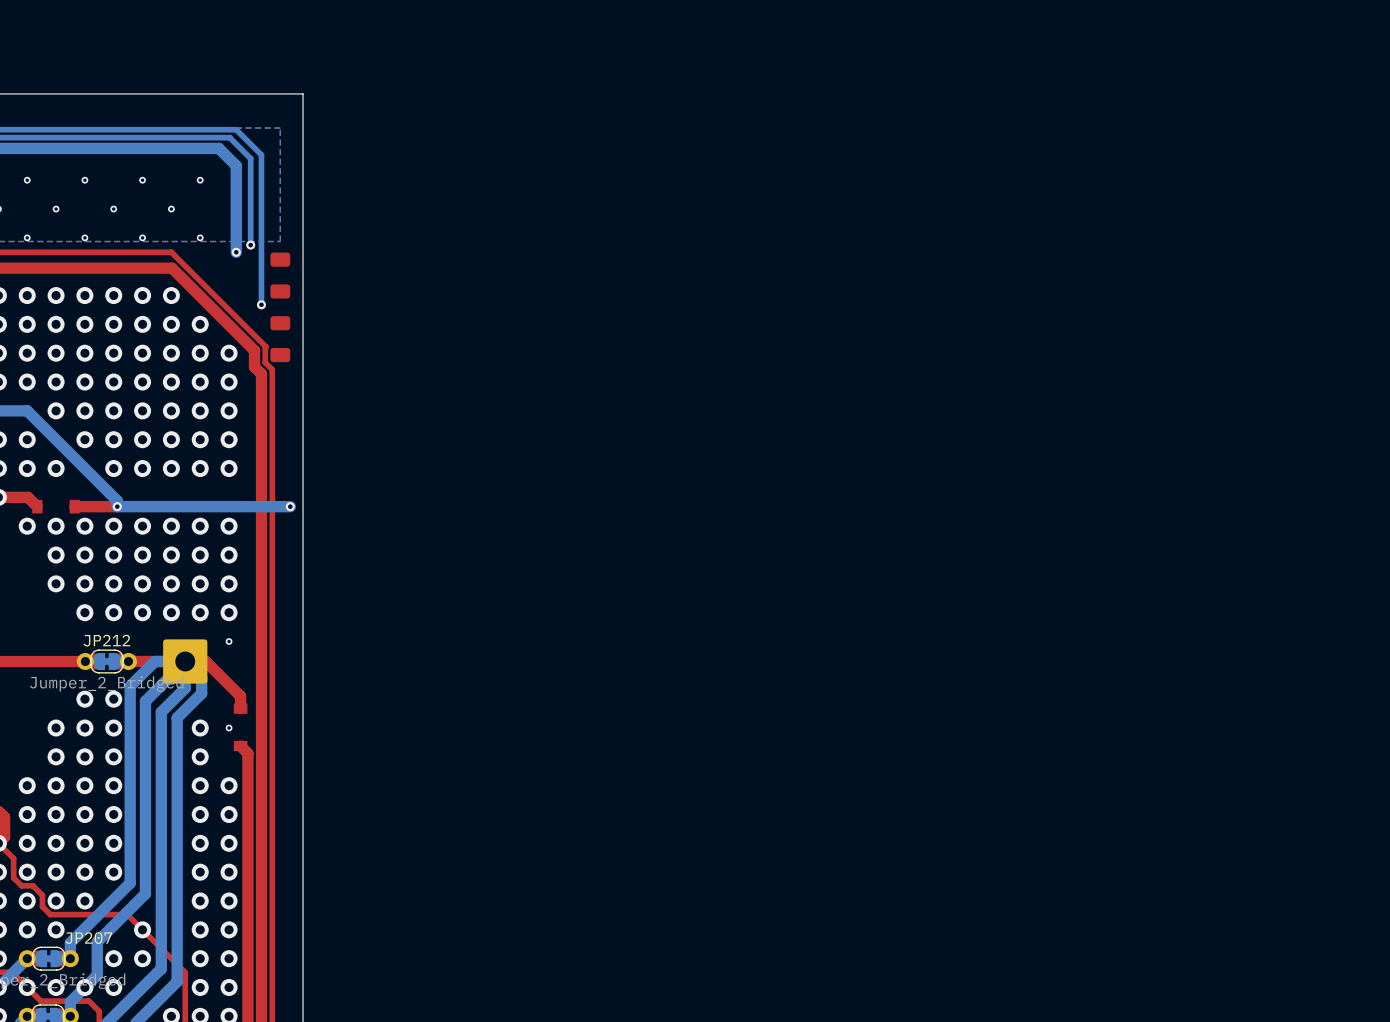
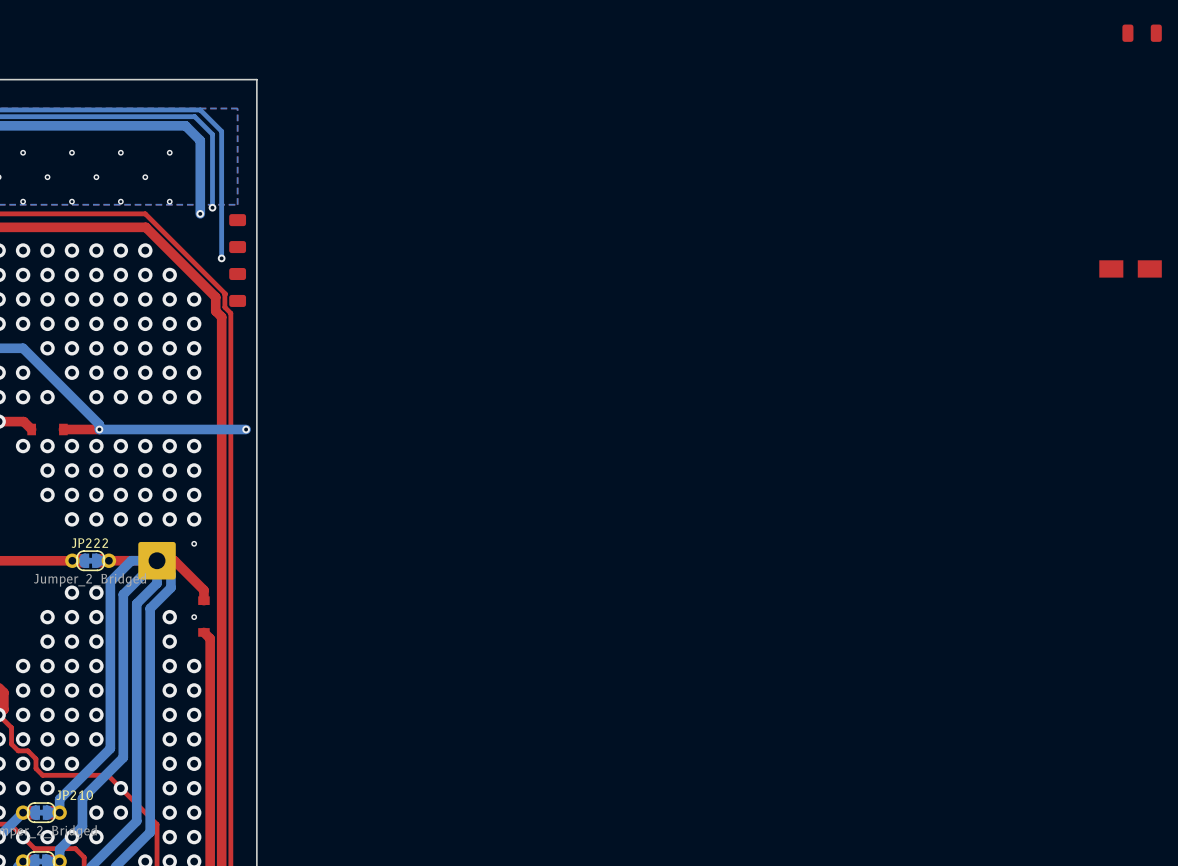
part: none -> (1142, 33)
part: none -> (1130, 268)
JP212 name: JP212 (107, 640) -> JP222 (89, 543)
JP207 name: JP207 (88, 938) -> JP210 (74, 795)

